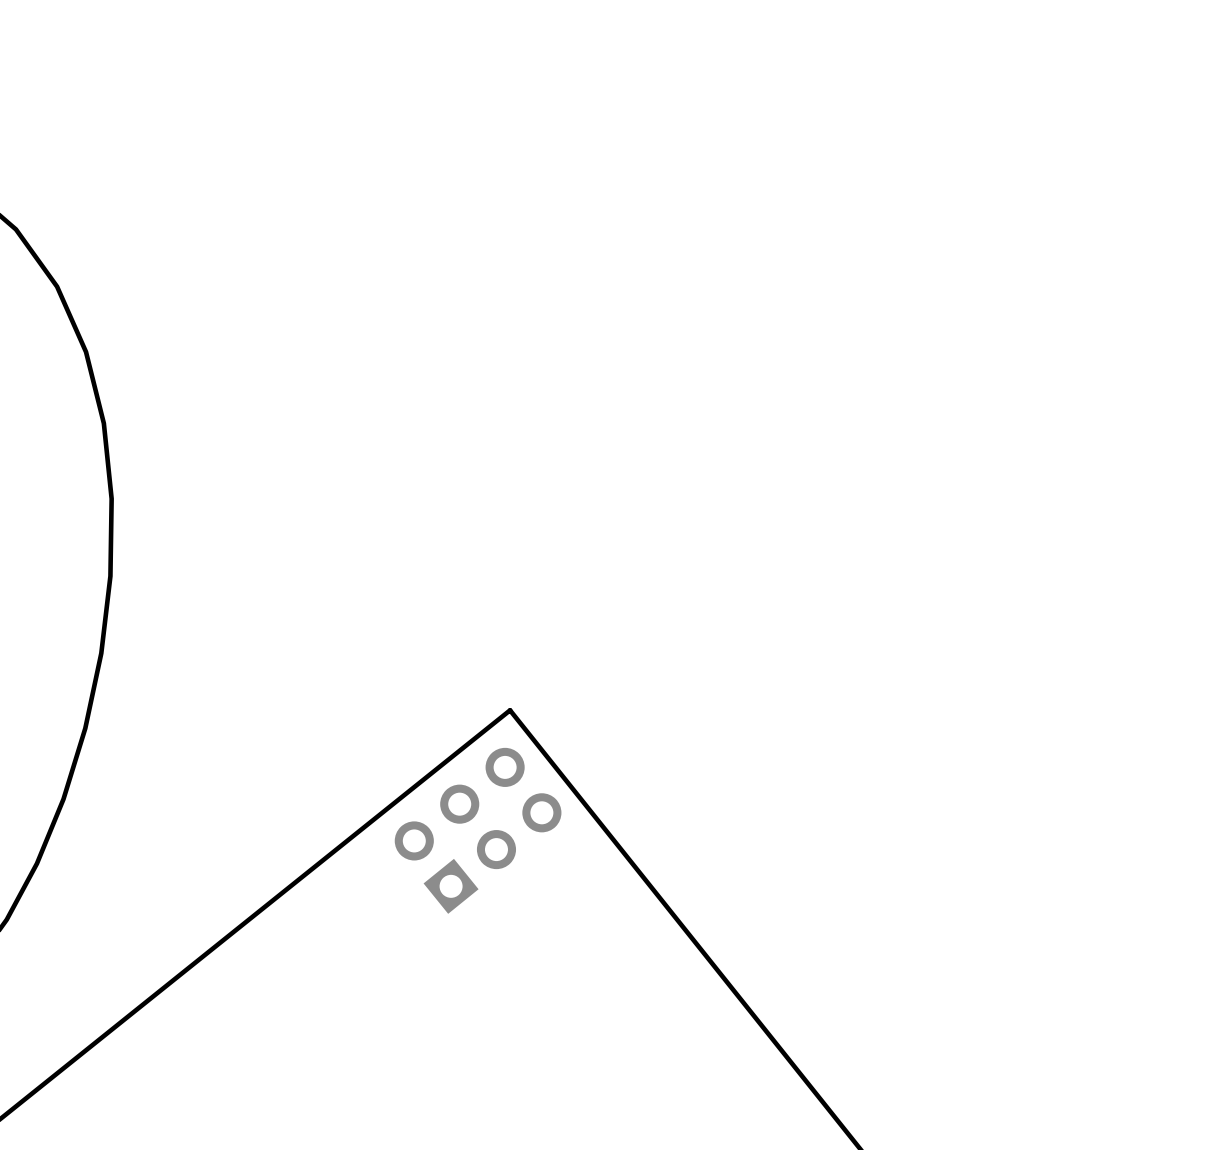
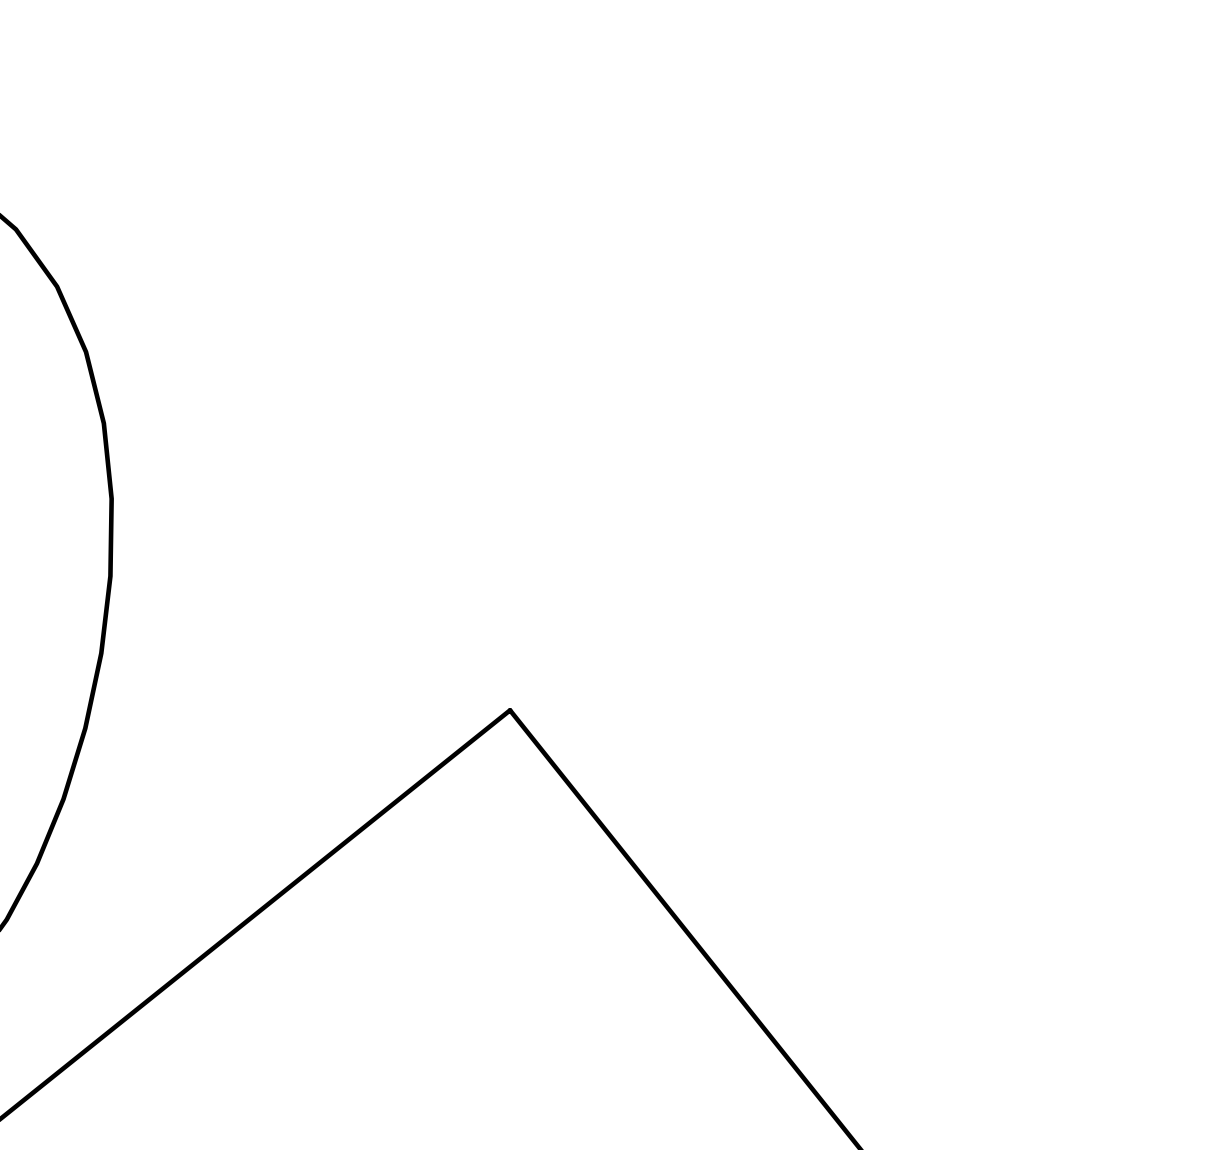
part: (478, 830) -> none

